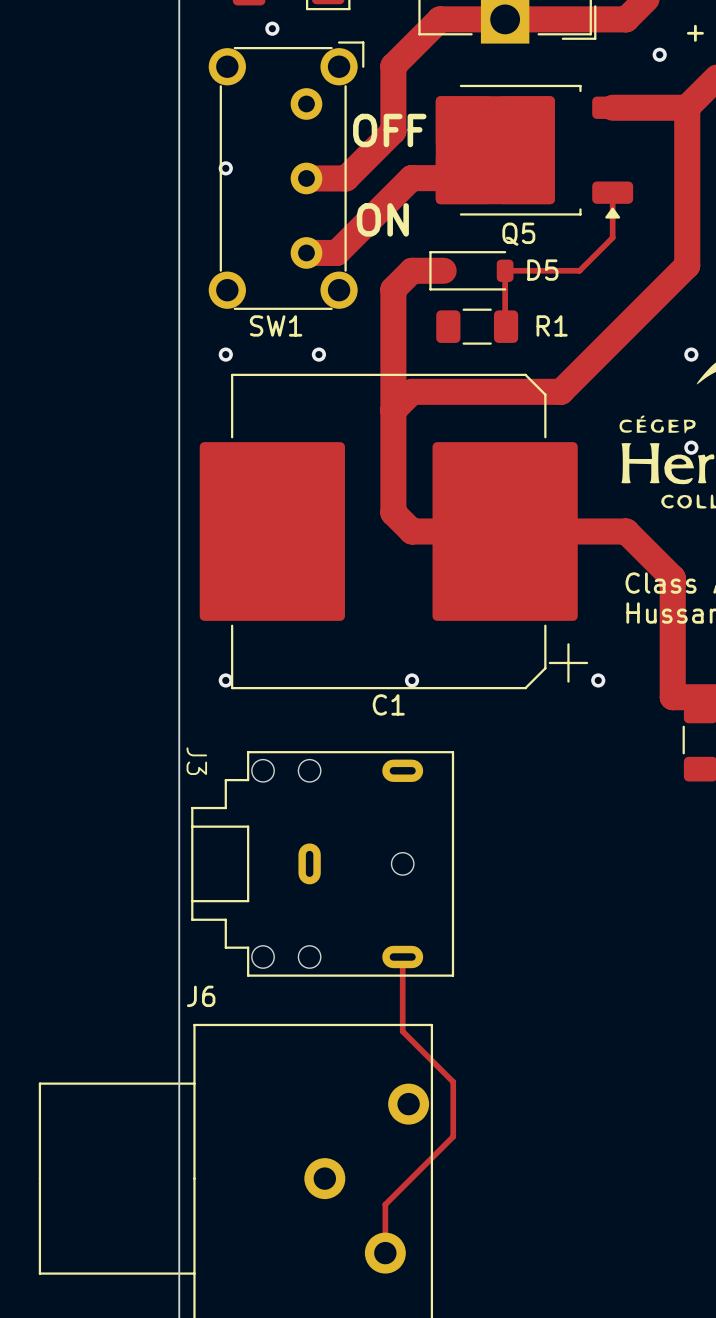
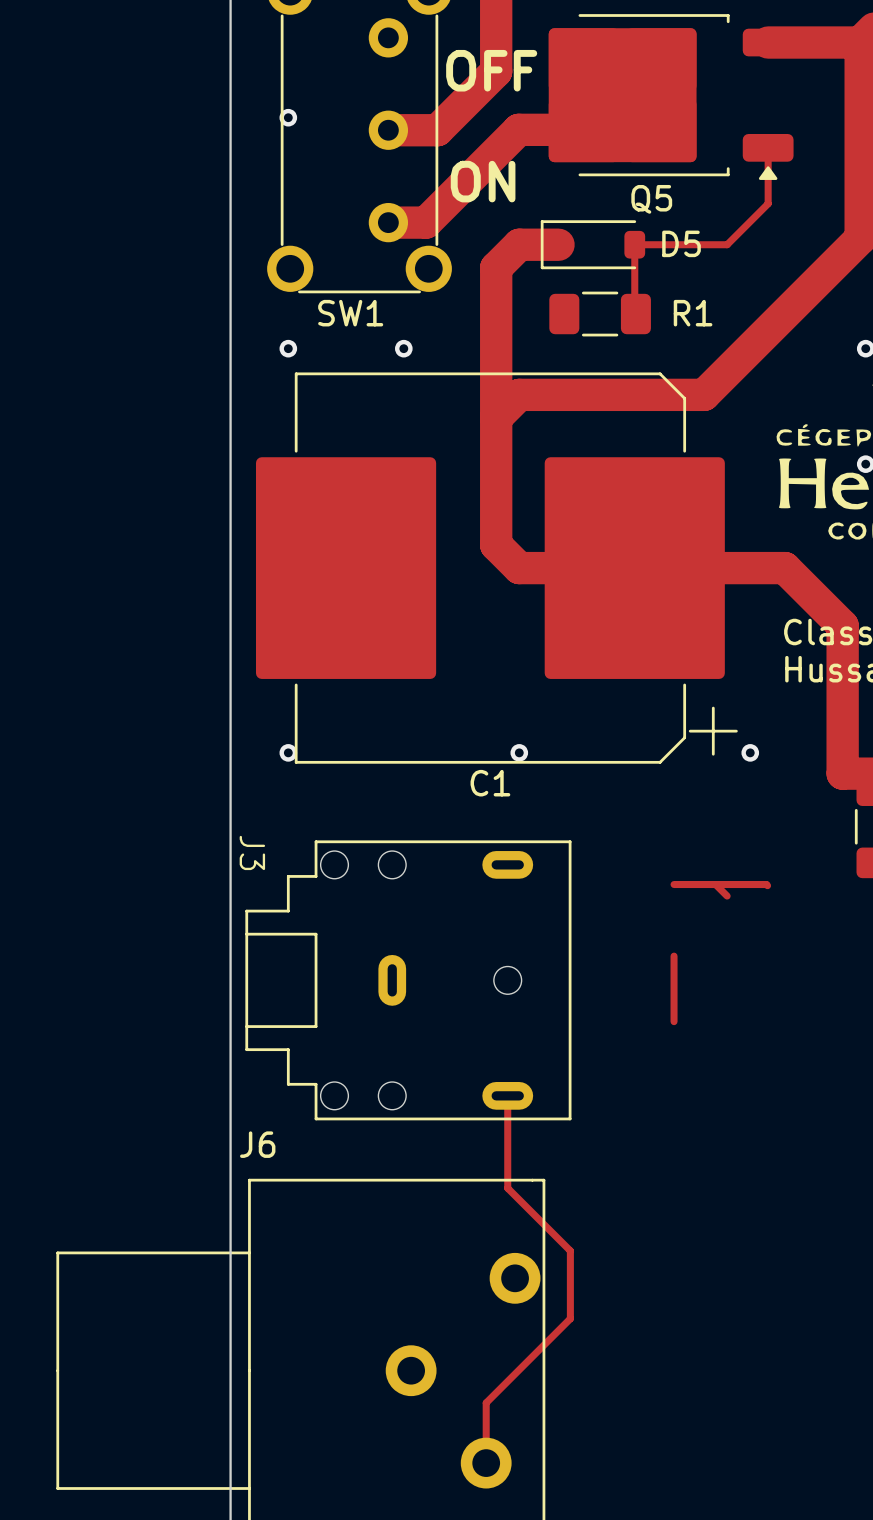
track: none -> (674, 884) (767, 885)
track: none -> (715, 884) (727, 896)
track: none -> (674, 956) (674, 1021)

